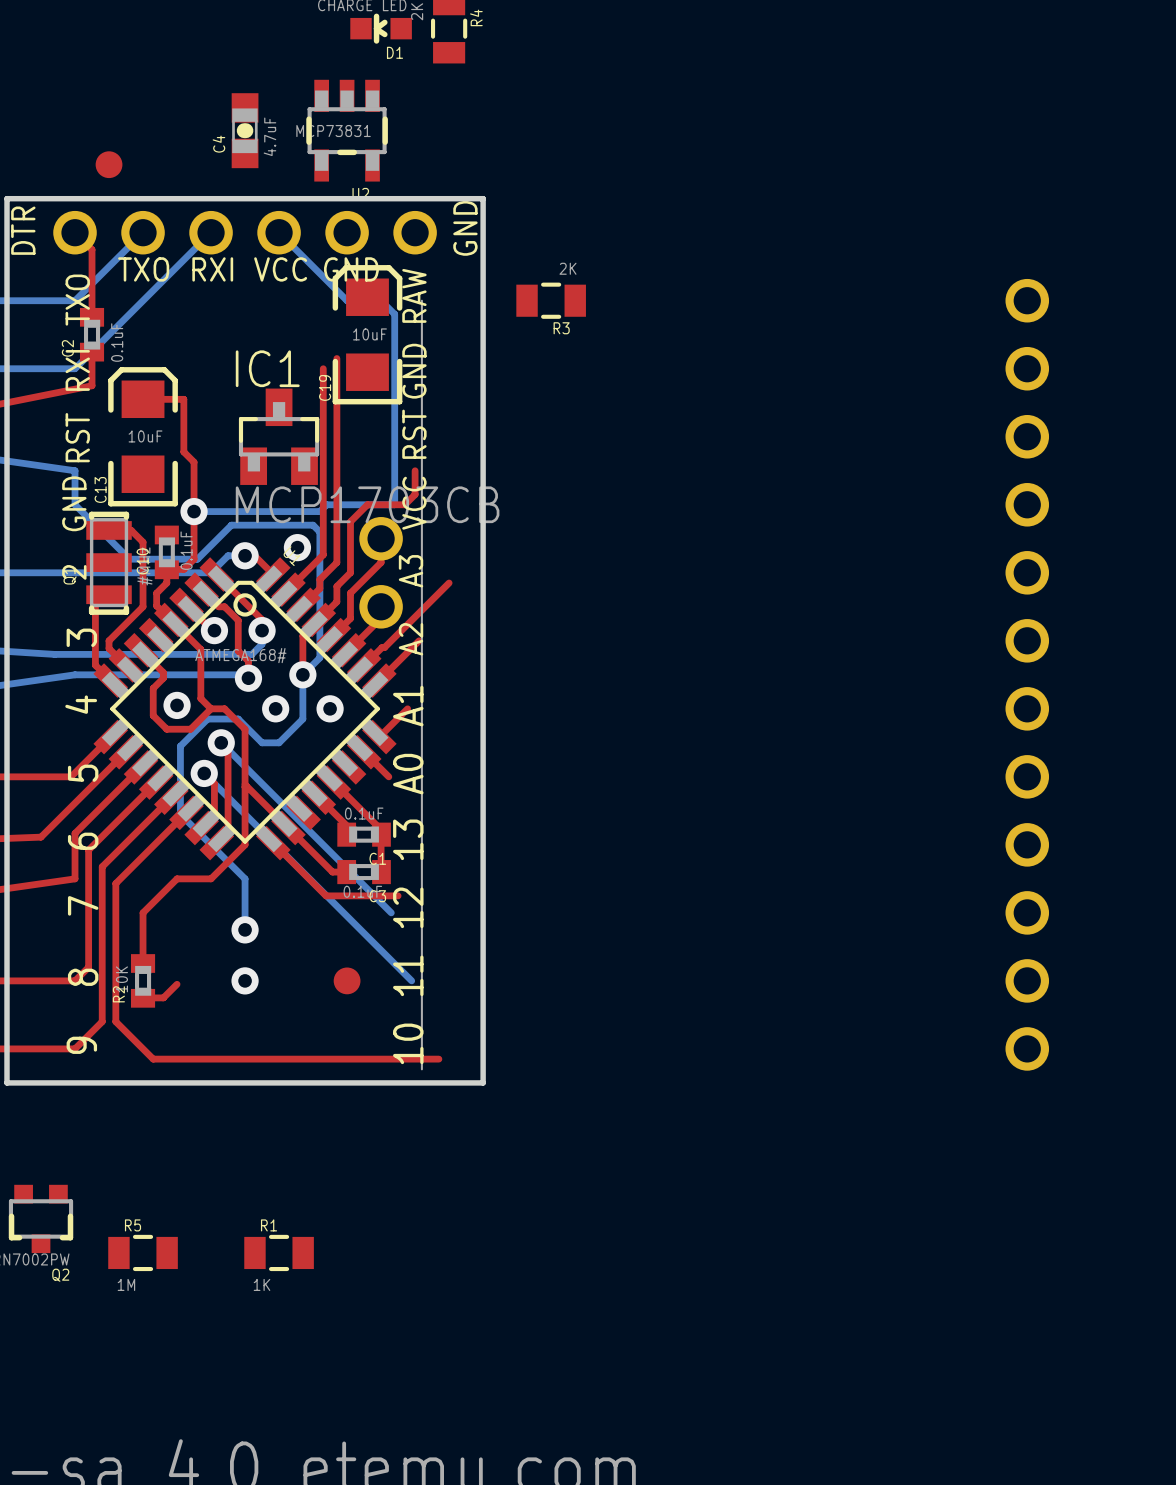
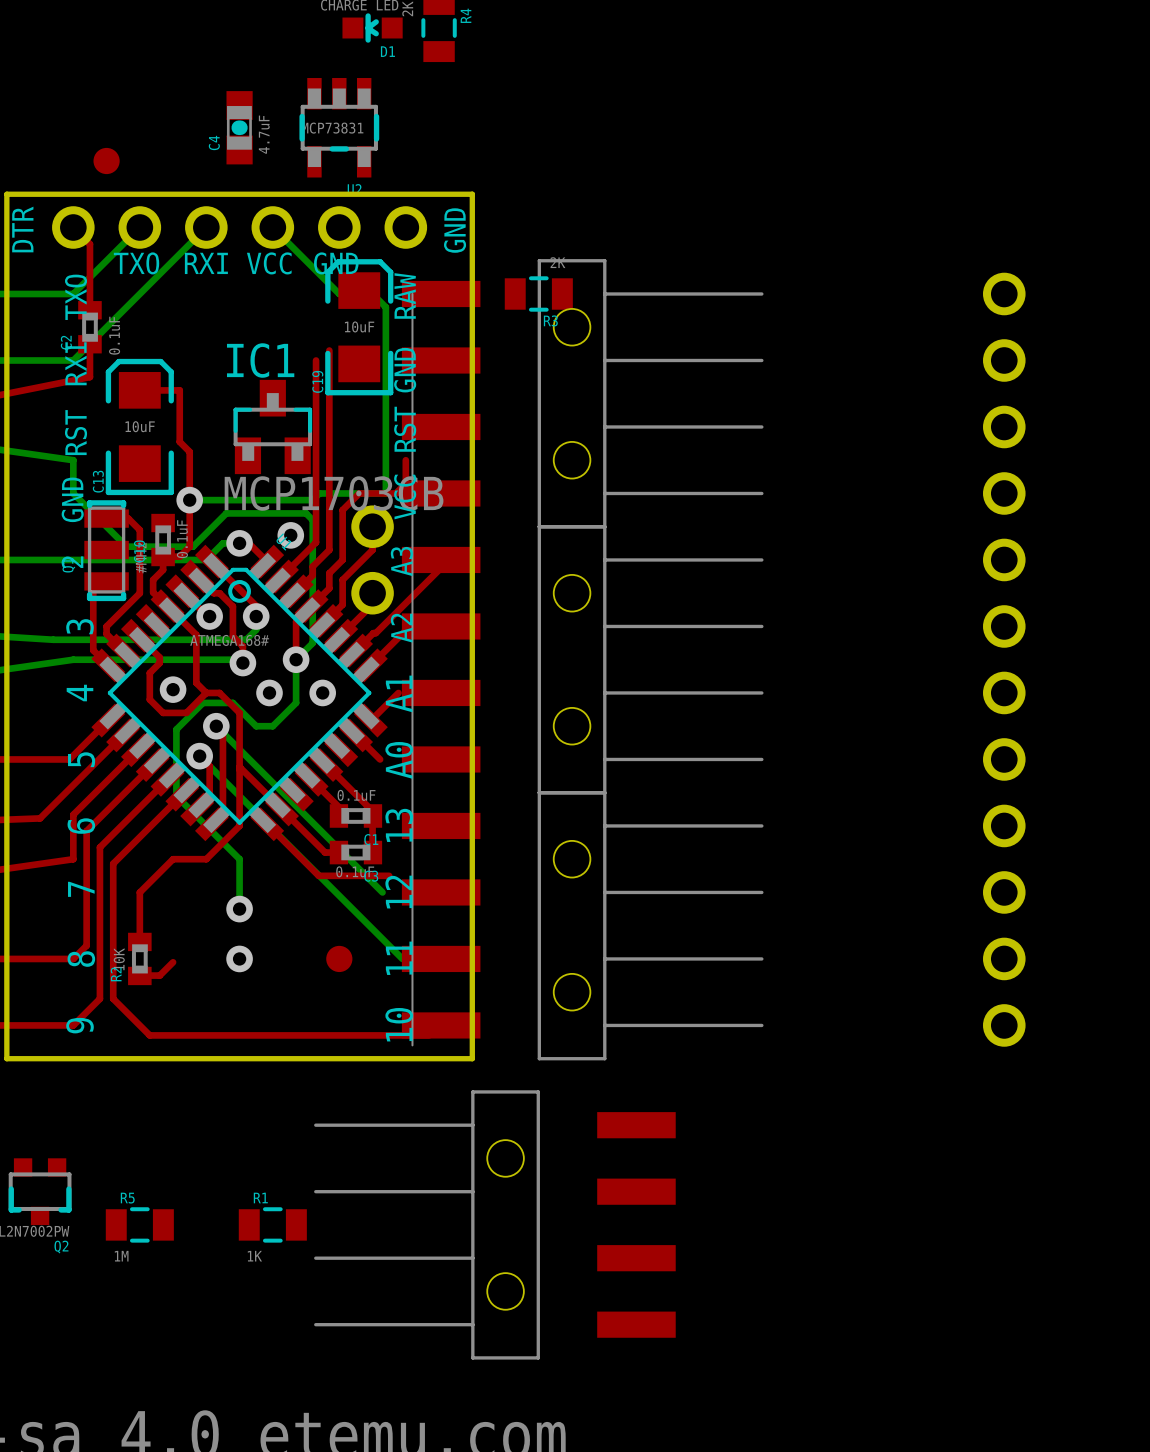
part: none -> (582, 393)
part: none -> (582, 659)
part: none -> (582, 925)
part: none -> (494, 1224)

